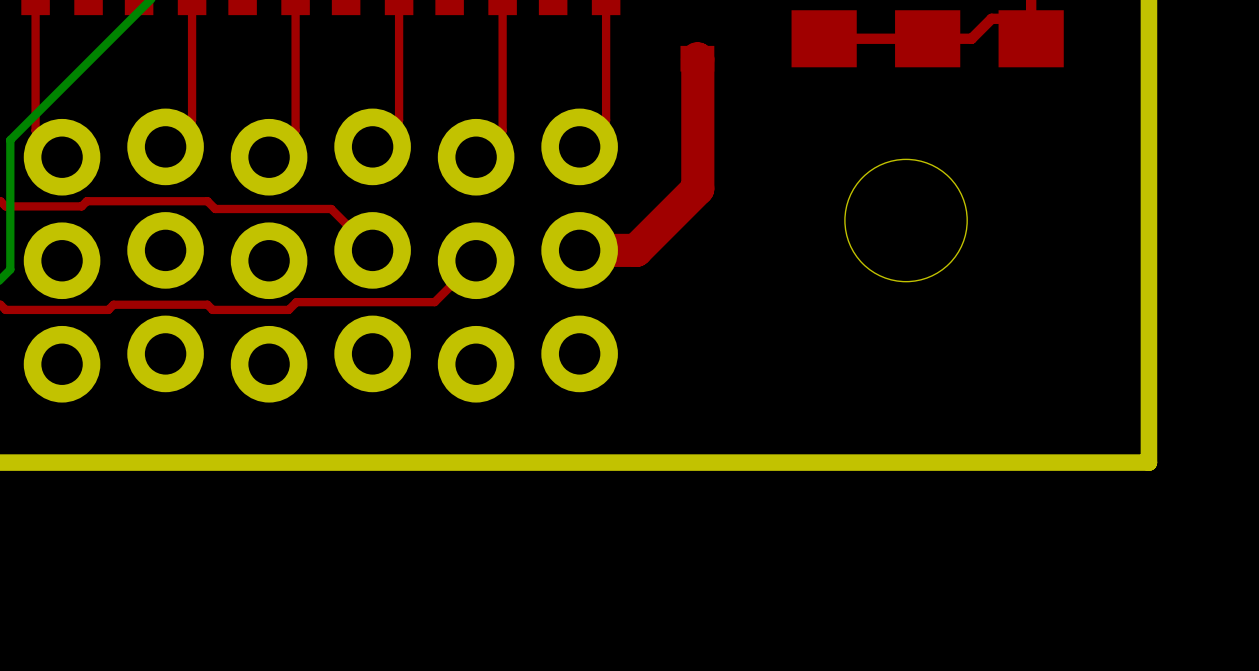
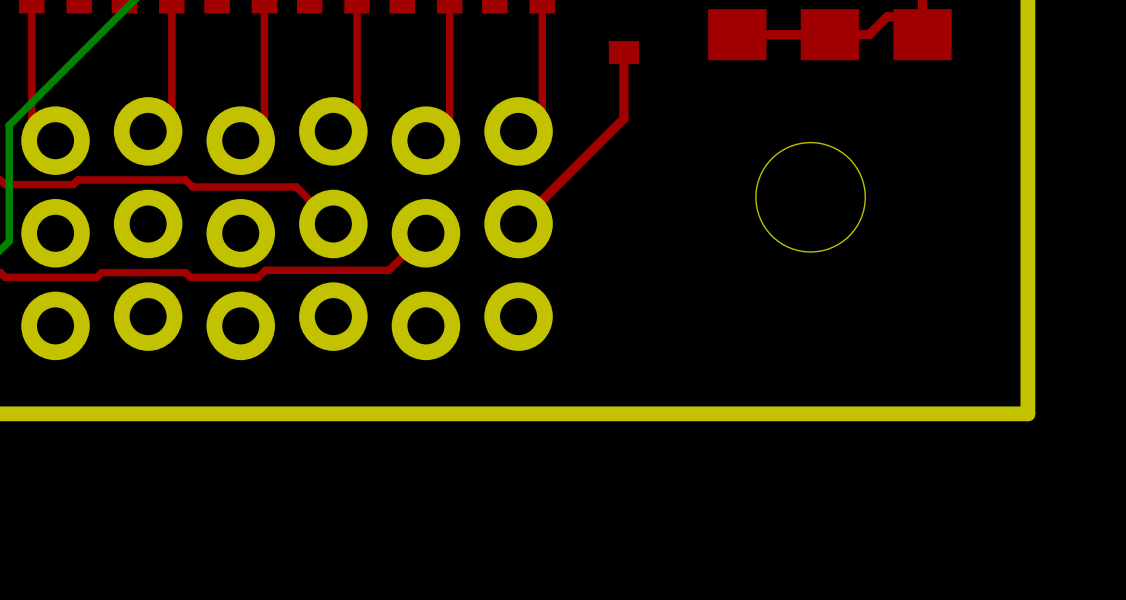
top track: (697, 59) (697, 188) (636, 250) (579, 250) -> (623, 52) (623, 118) (518, 224)

